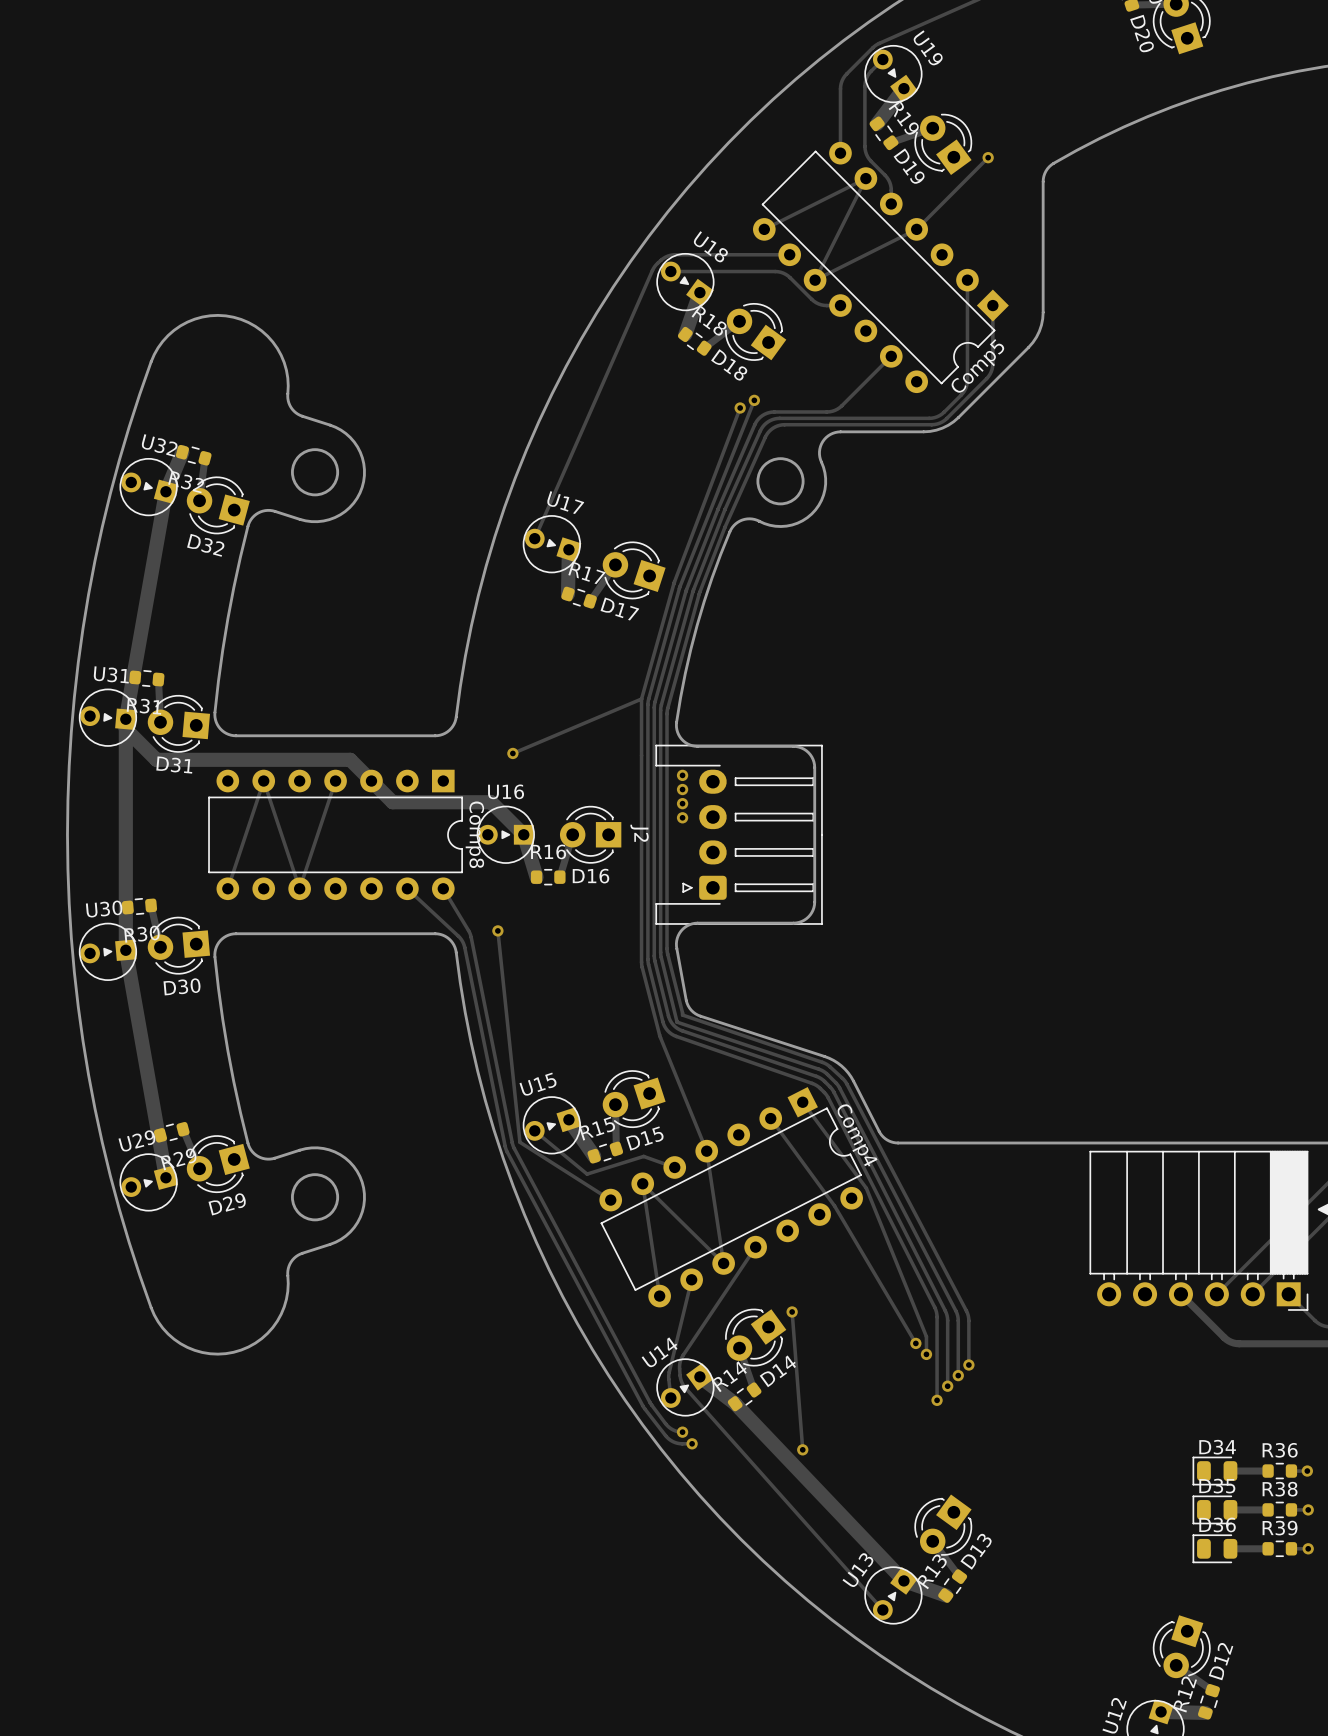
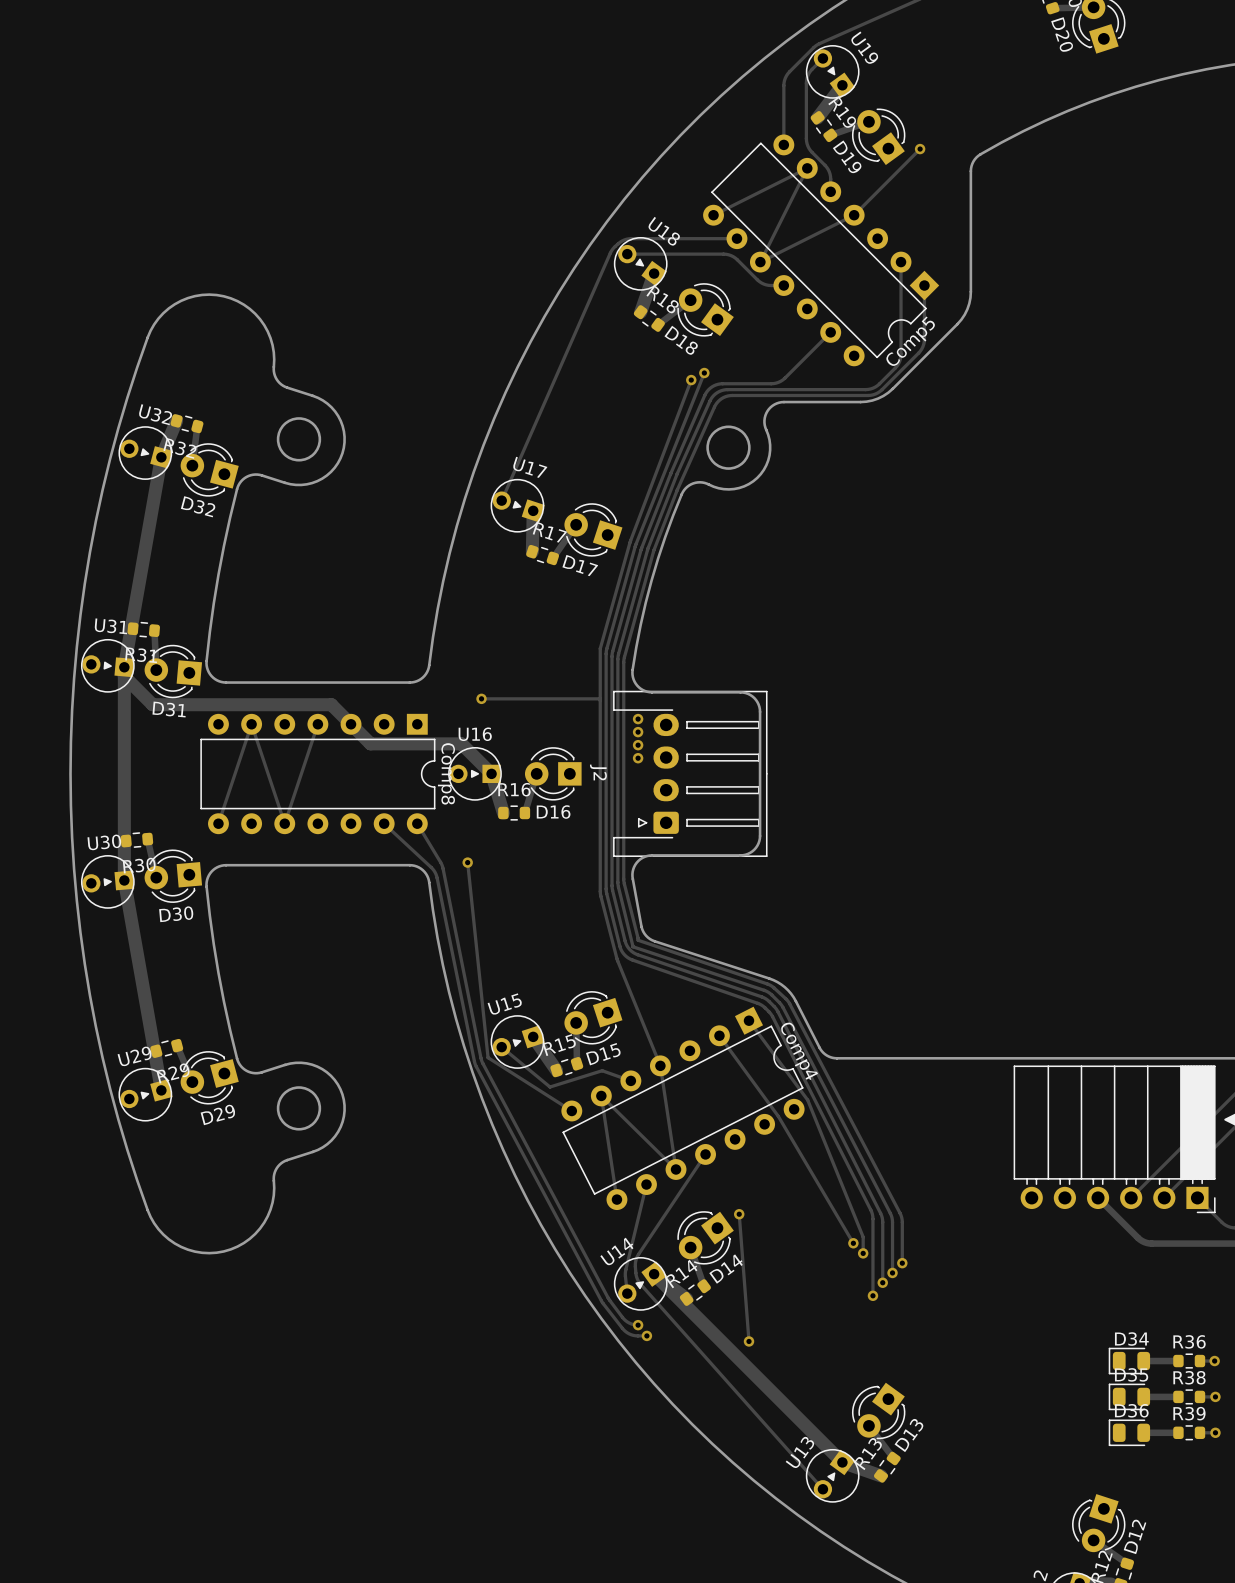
track: (641, 699) (512, 753) -> (600, 698) (481, 698)
track: (735, 1403) (903, 1580) -> (654, 1274) (842, 1462)

